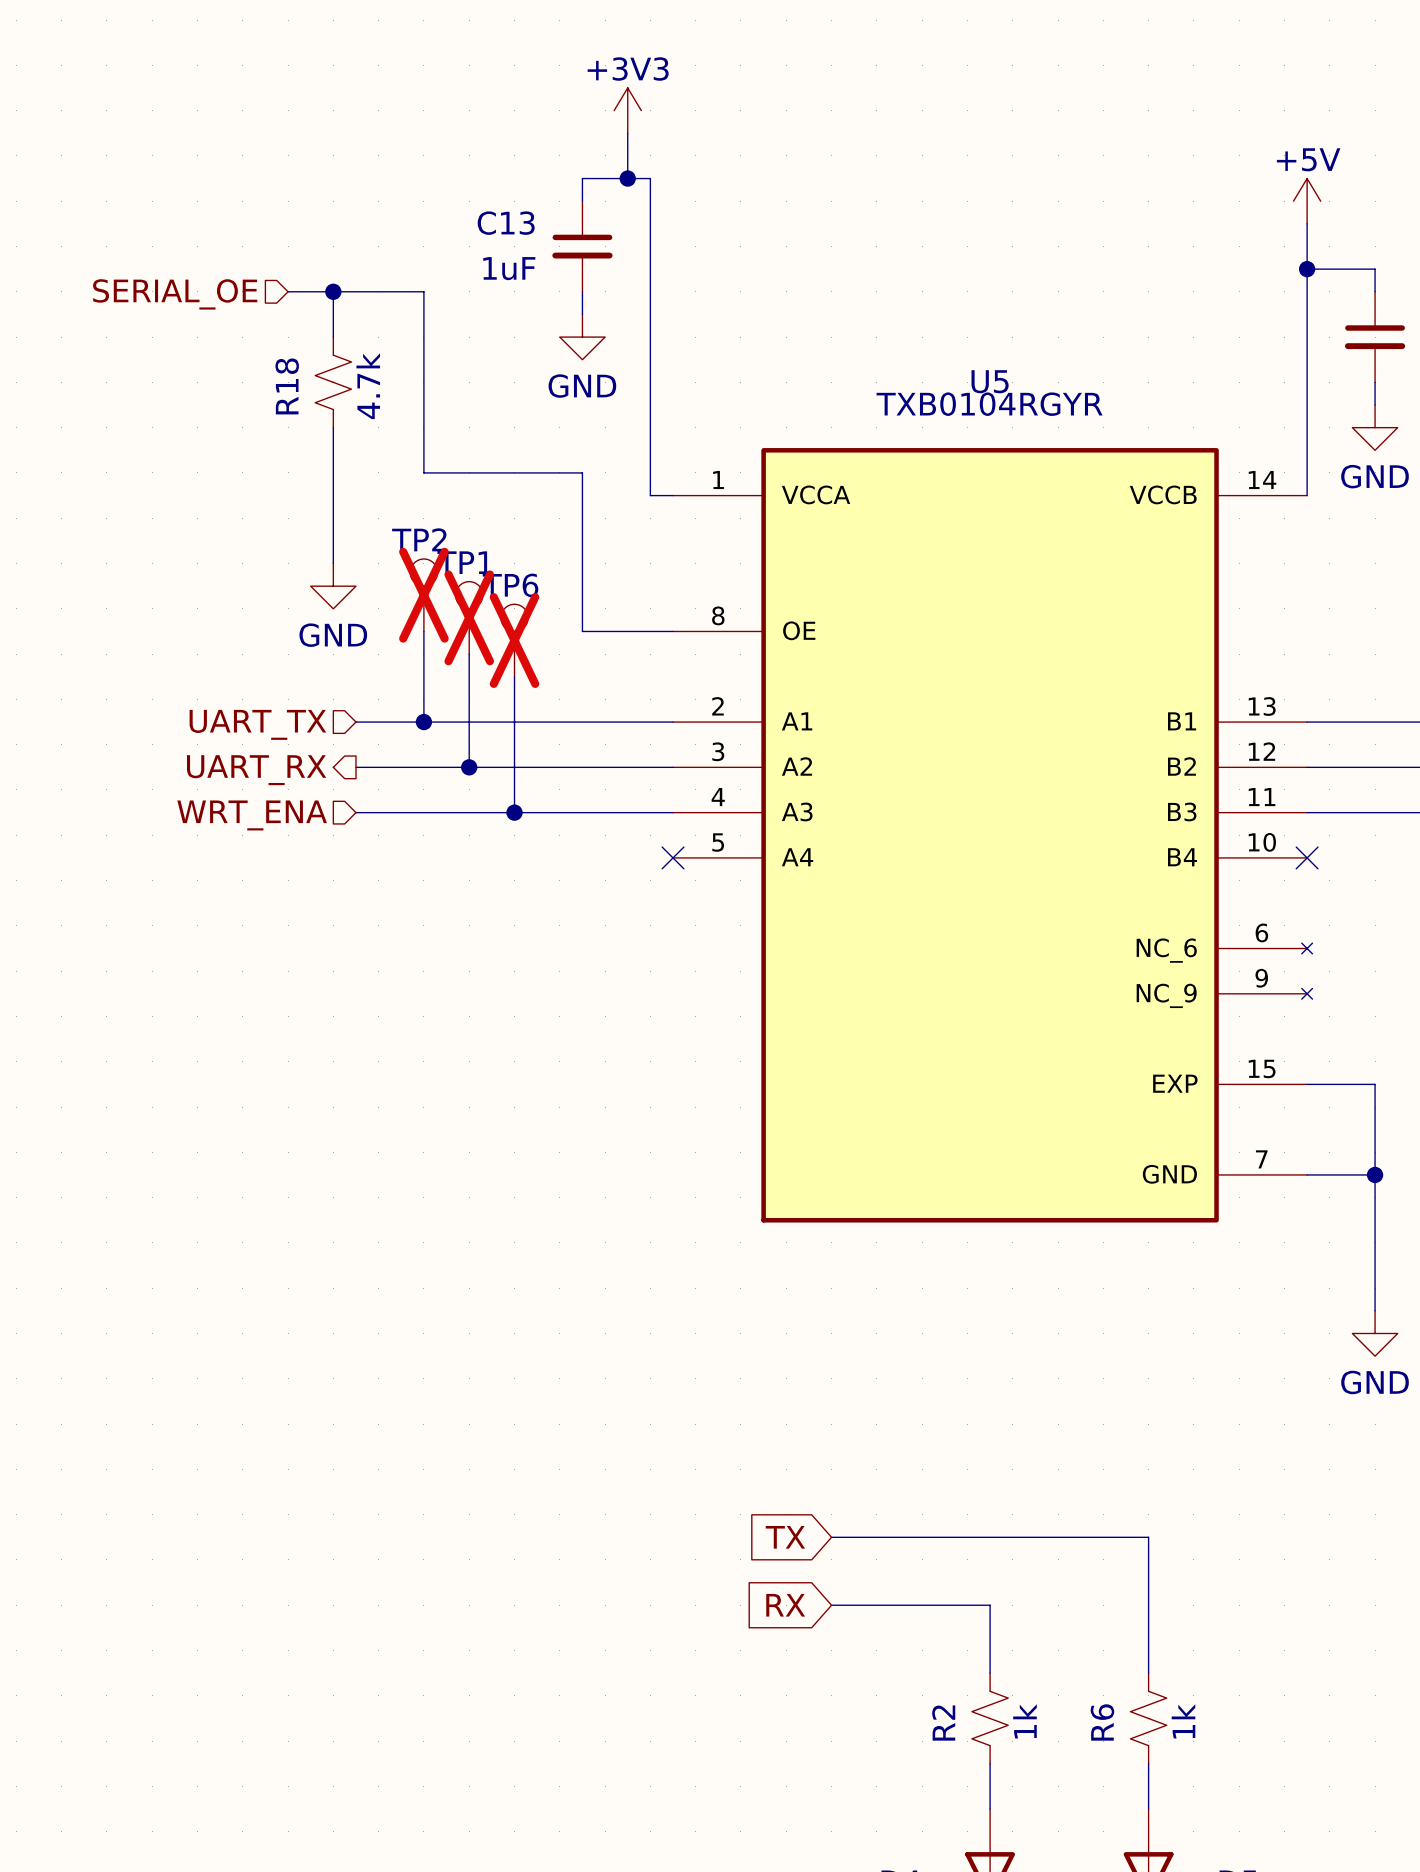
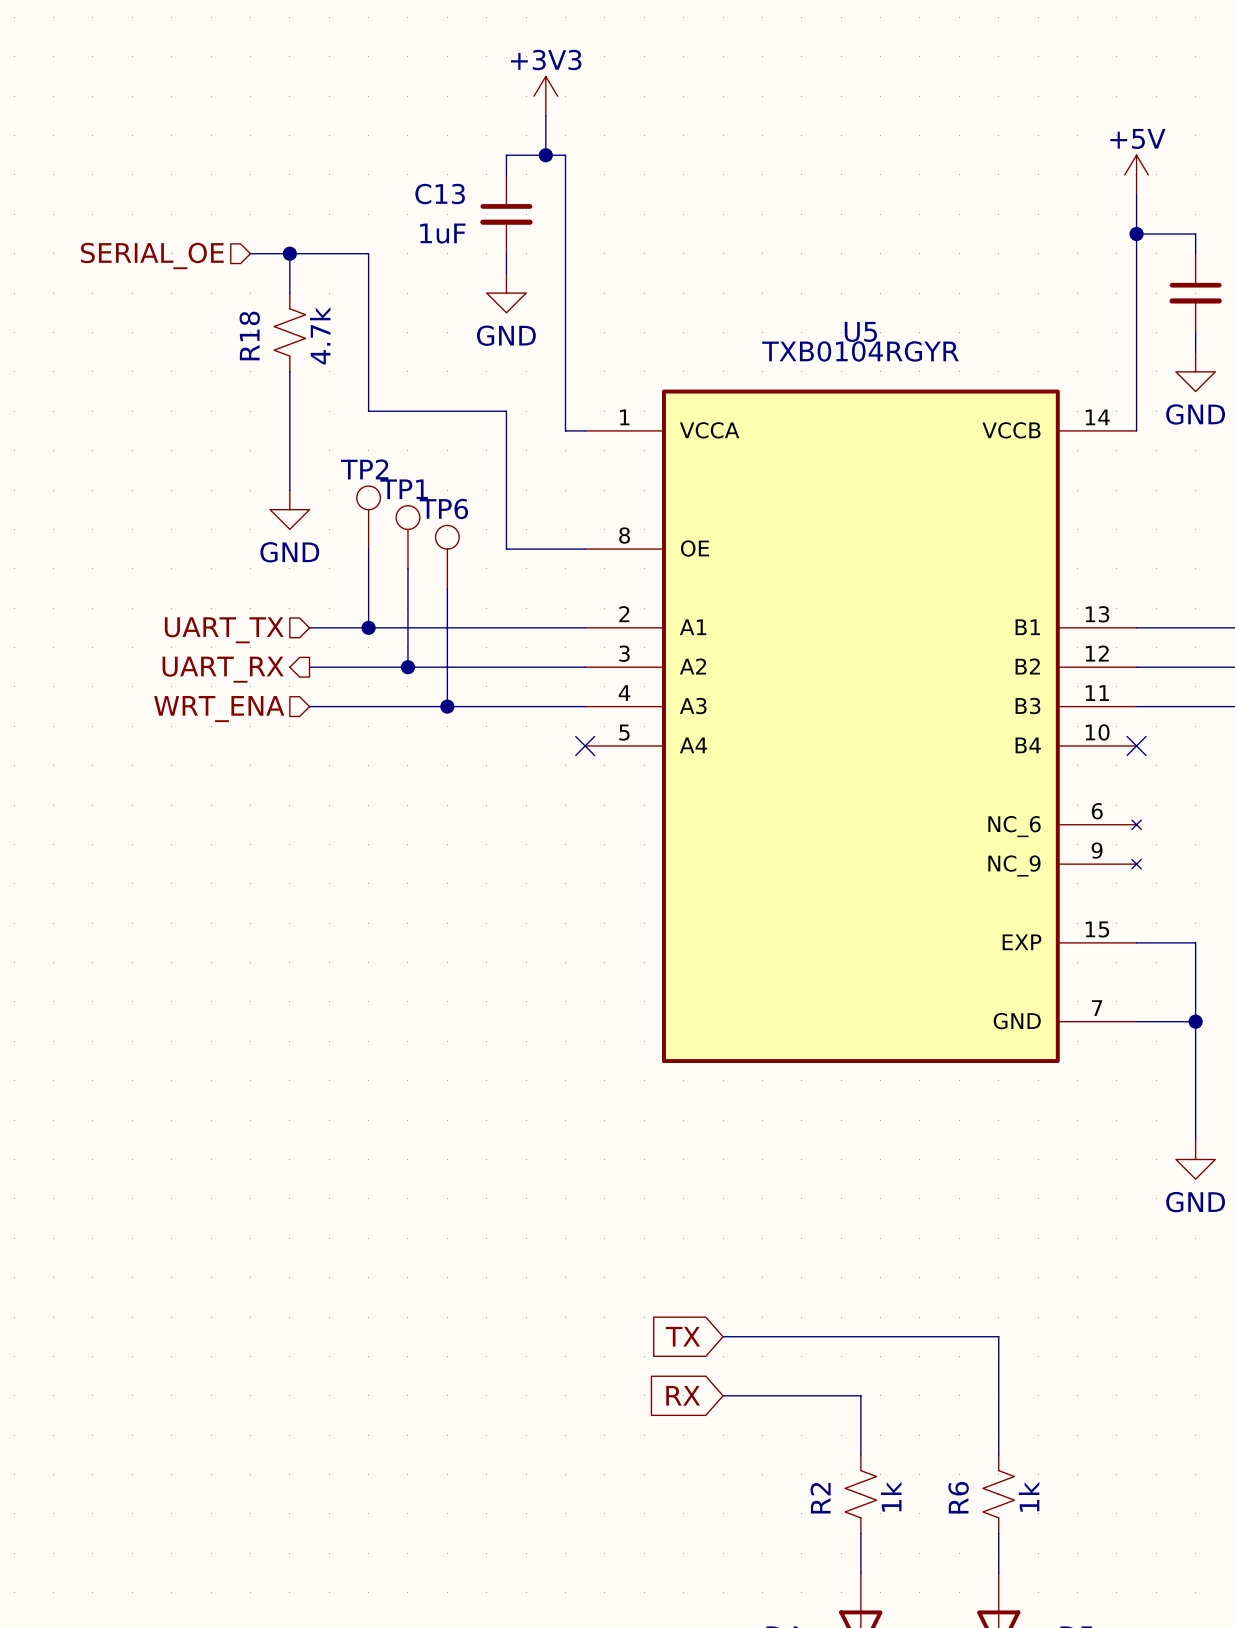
TP2 do-not-place cross: (423, 595) -> none
TP1 do-not-place cross: (469, 617) -> none
TP6 do-not-place cross: (514, 640) -> none

